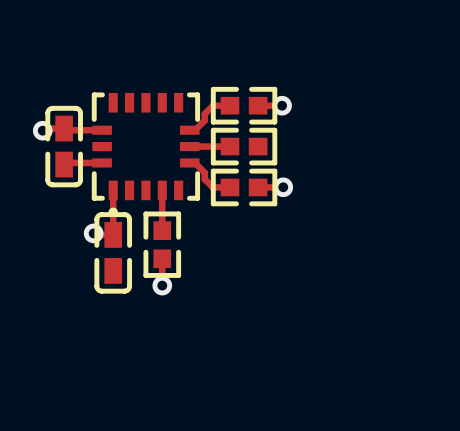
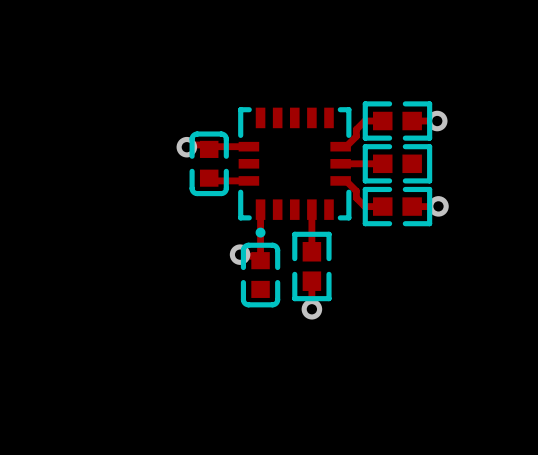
part footprint: [45, 105, 83, 188] -> [189, 131, 229, 197]
part footprint: [94, 212, 133, 294] -> [240, 242, 281, 308]

